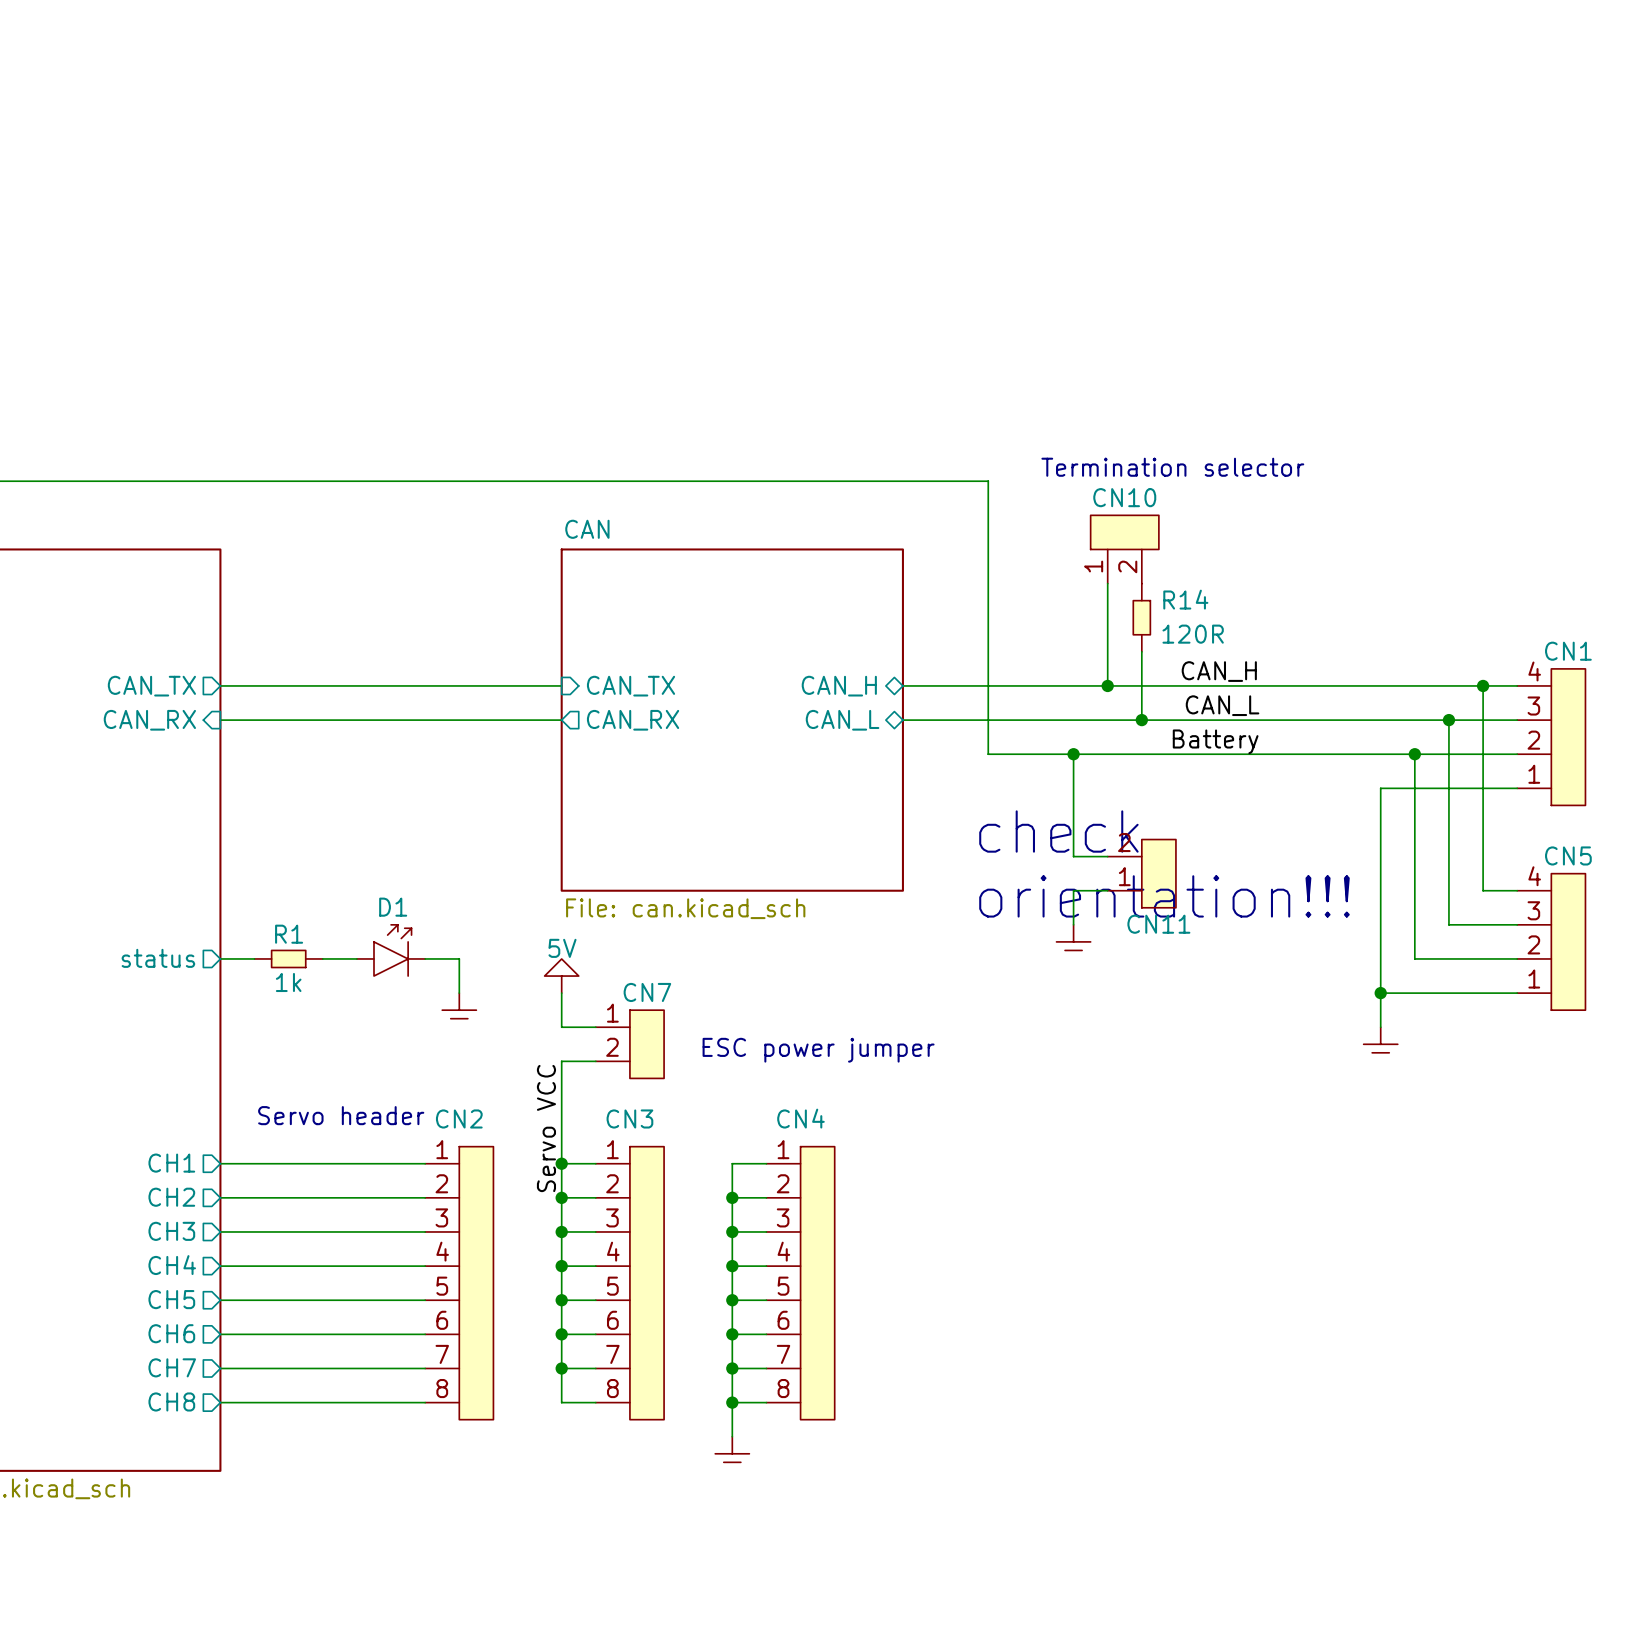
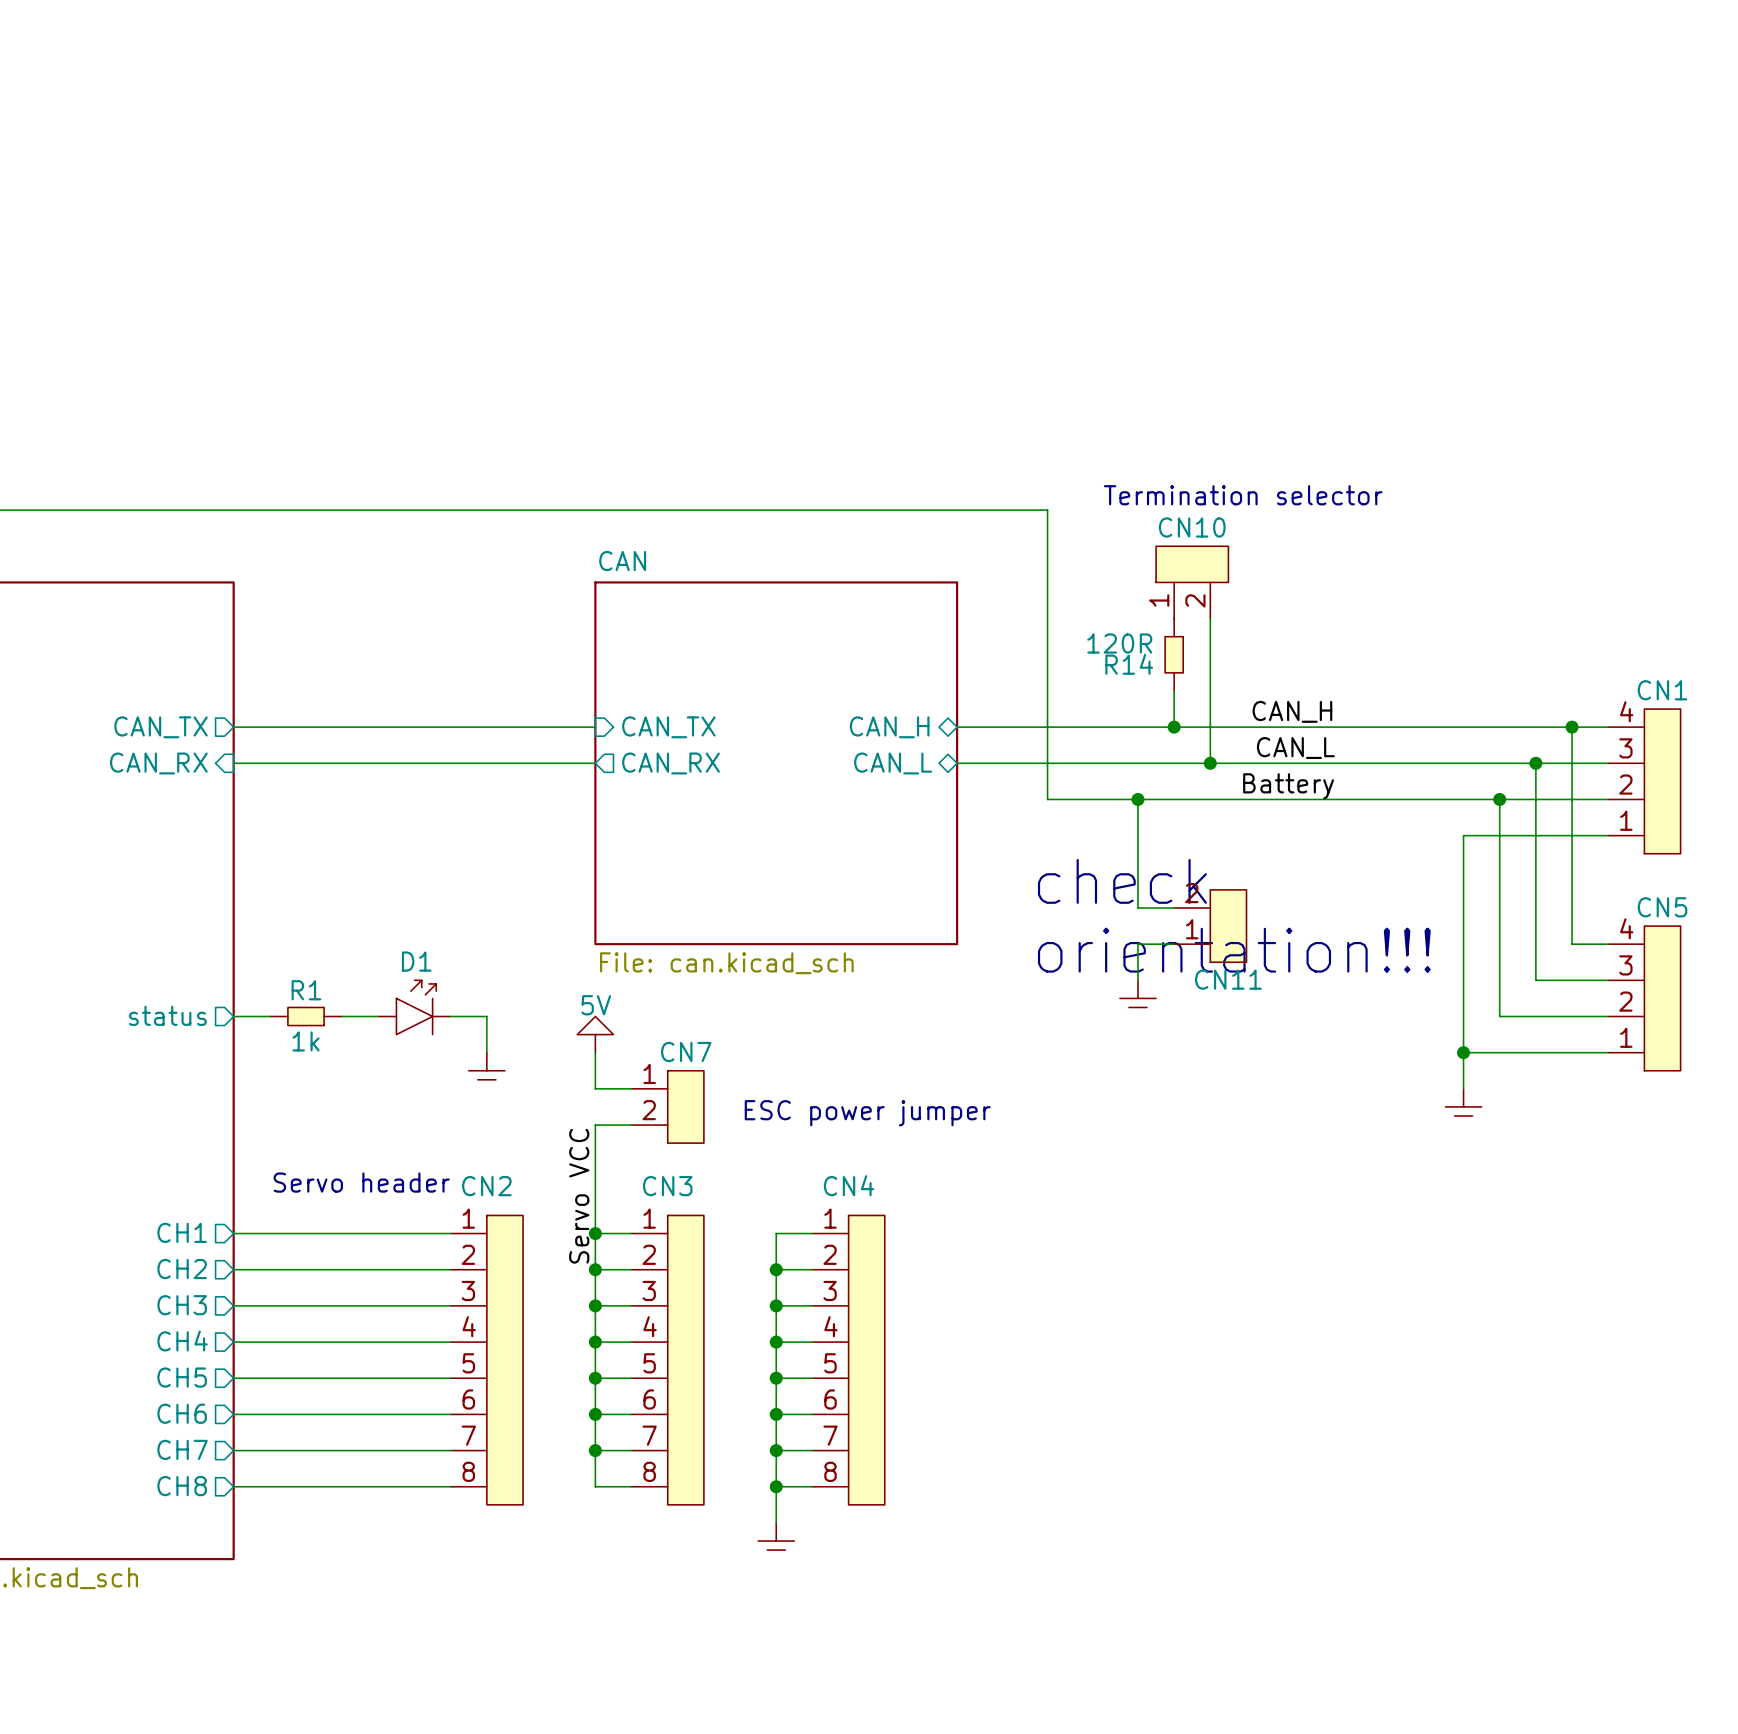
R14 name position: R14 (1185, 599) -> R14 (1129, 664)
R14 position: (1141, 617) -> (1174, 654)
R14 value position: 120R (1193, 634) -> 120R (1119, 643)

